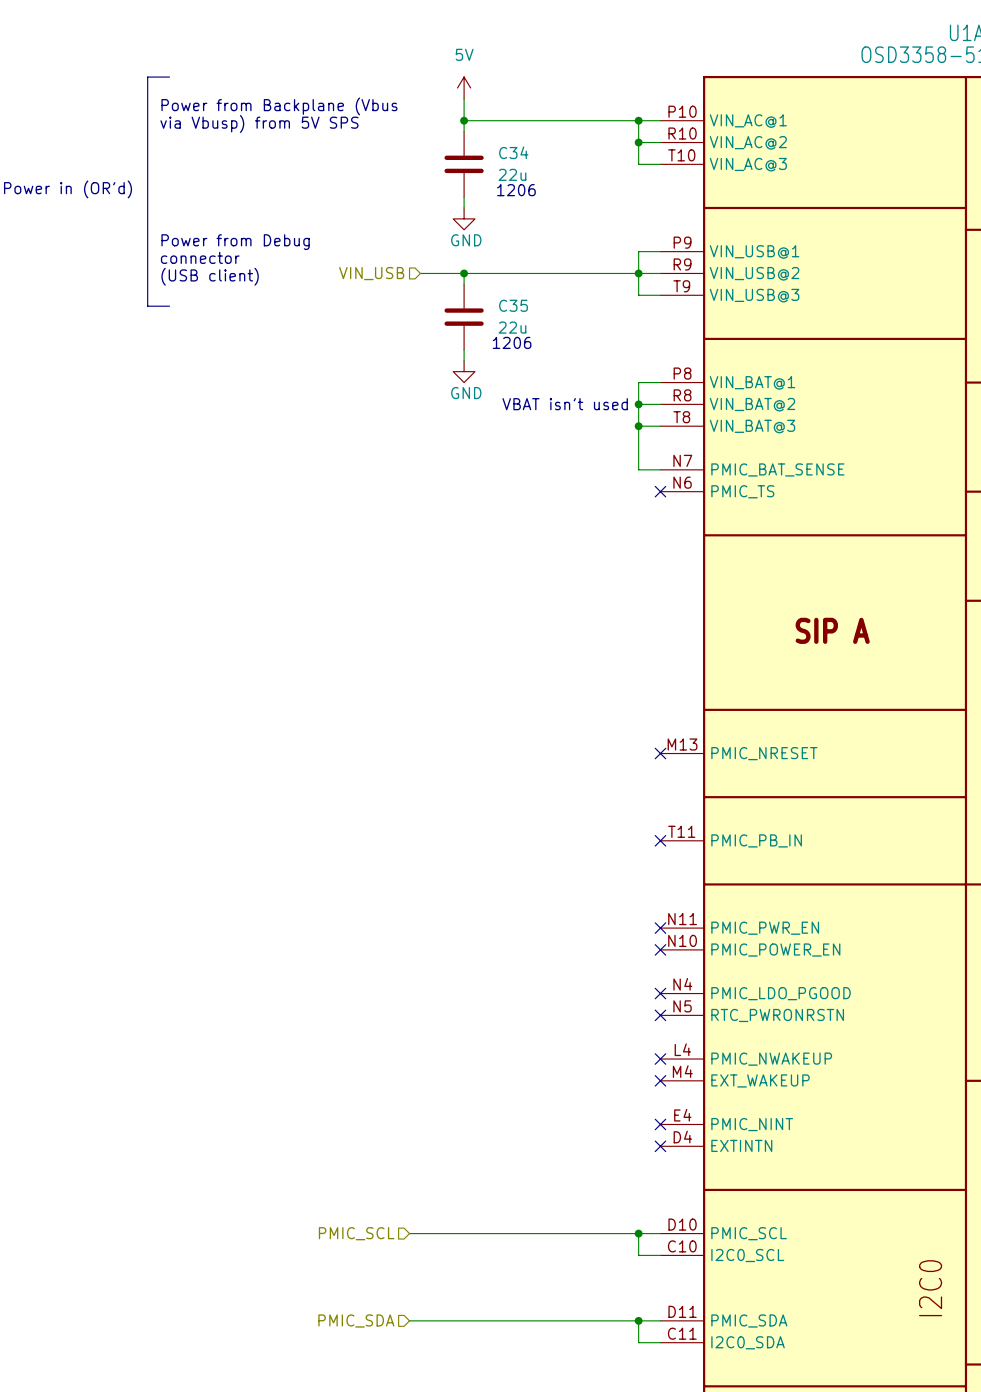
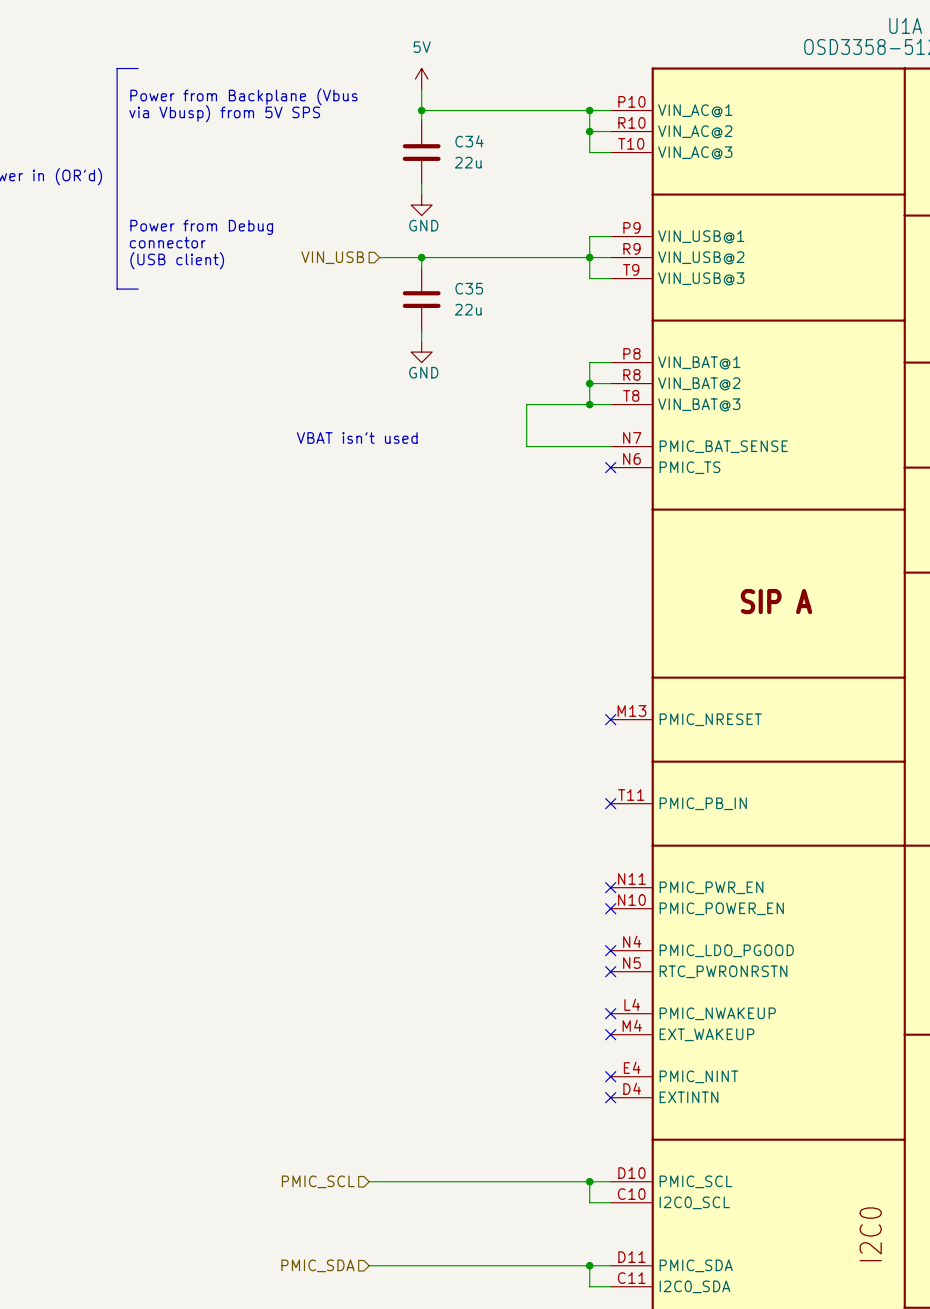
text: 1206 (516, 190) -> none
text: 1206 (512, 342) -> none
text position: VBAT isn't used (565, 404) -> VBAT isn't used (357, 437)
wire: (638, 426) (638, 469) -> (589, 404) (526, 404) (526, 446) (589, 446)

